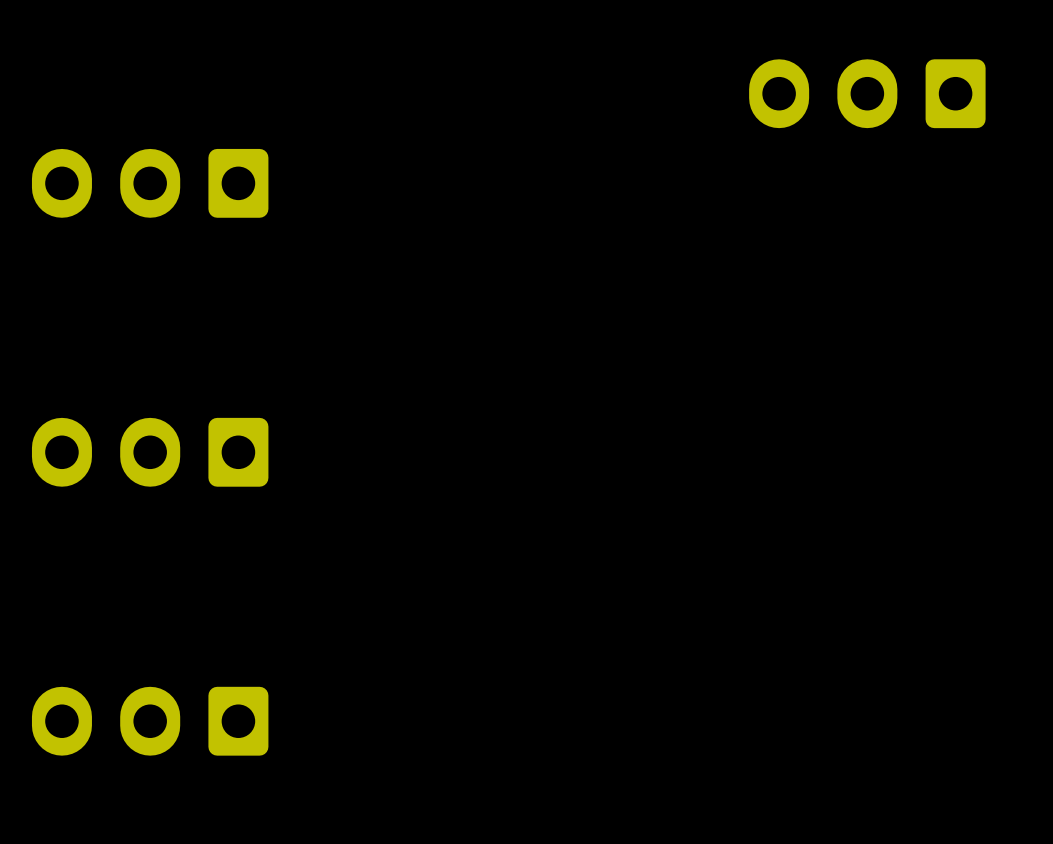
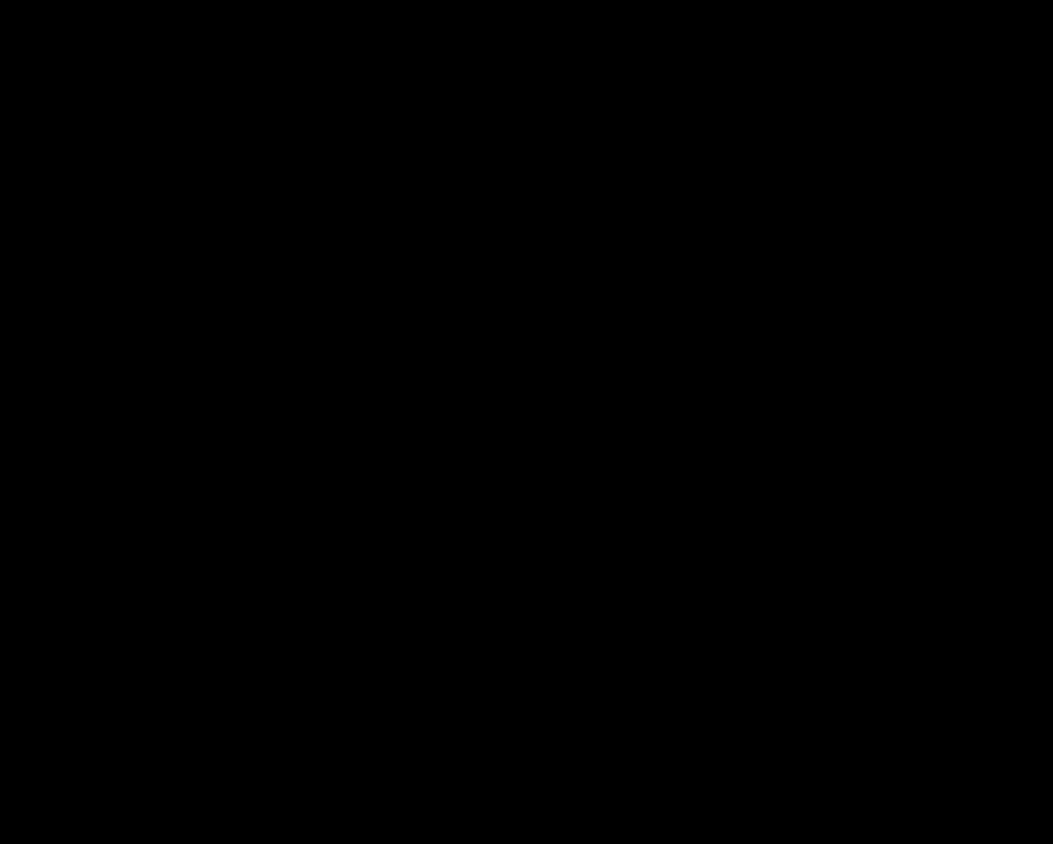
part: (867, 93) -> none
part: (150, 183) -> none
part: (150, 452) -> none
part: (150, 721) -> none

